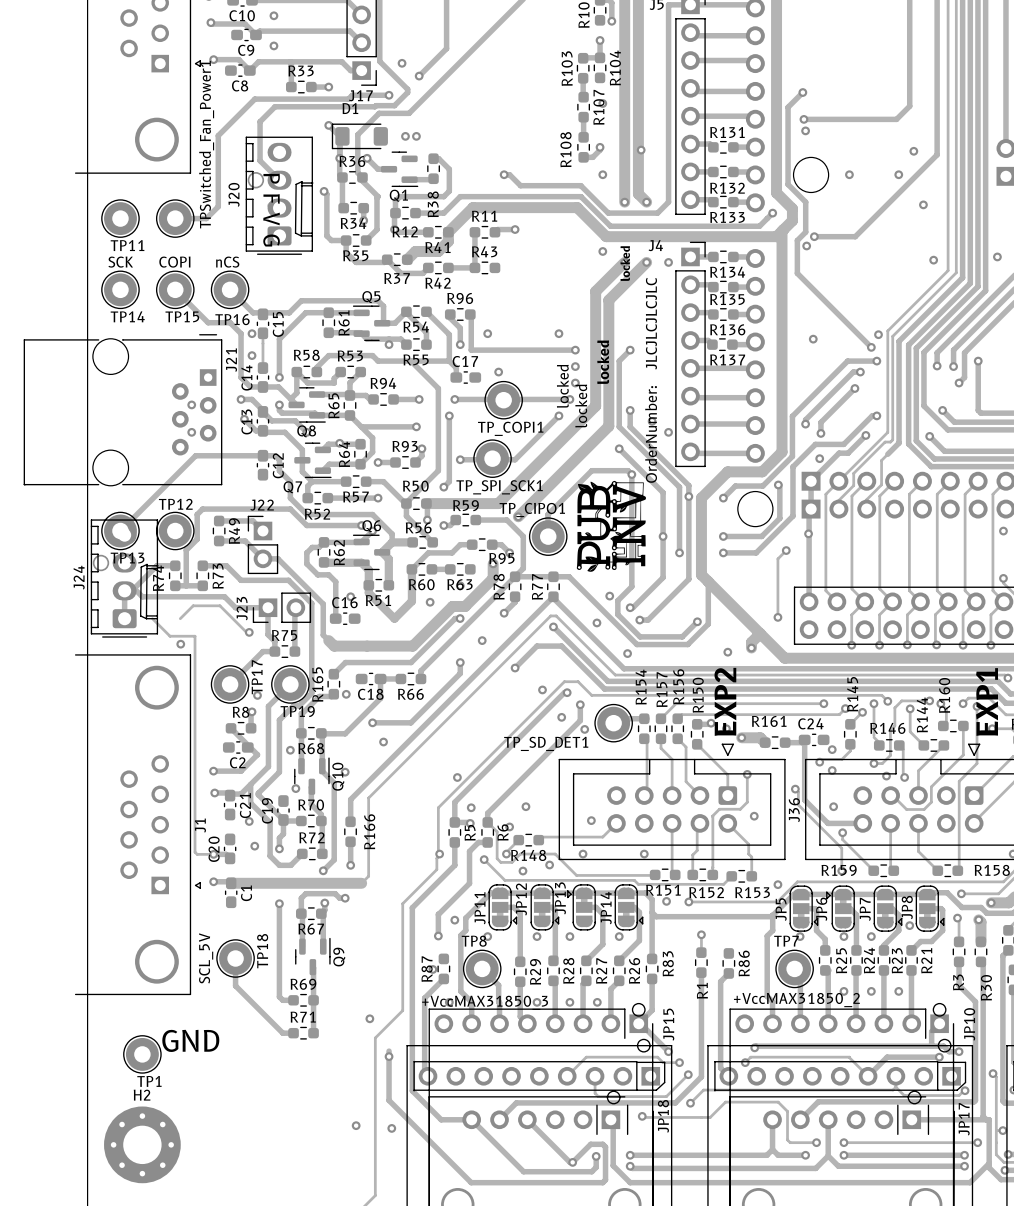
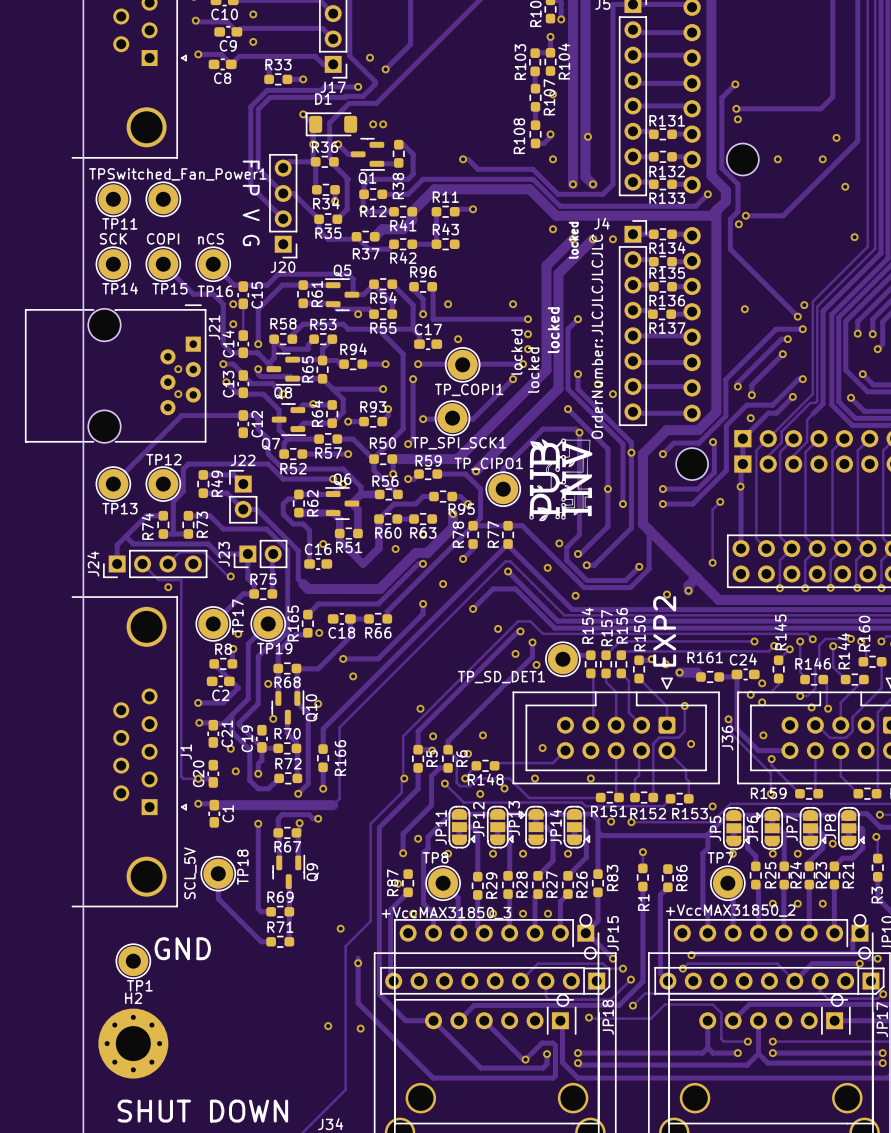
track: (289, 99) (254, 99) (218, 135) (218, 206) (206, 218) (175, 218) -> (267, 90) (250, 106) (250, 186) (283, 218)
track: (292, 106) (275, 106) (260, 121) (260, 160) (279, 180) -> (270, 97) (258, 109) (258, 168) (283, 193) (293, 193) (319, 219)
J20 footprint: [245, 136, 314, 255] -> [269, 154, 298, 259]
TPSwitched_Fan_Power1 name rotation: 0° (206, 144) -> 90° clockwise (177, 174)
track: none -> (315, 161) (289, 161) (283, 168)
track: (324, 191) (326, 194) (326, 235) (331, 240) (346, 240) -> none
via: (324, 191) -> none
J20 name position: J20 (234, 194) -> J20 (282, 267)
text: P F V G (271, 210) -> F P V G (251, 203)
J24 footprint: [90, 519, 159, 638] -> [103, 550, 208, 578]
J24 name position: J24 (79, 577) -> J24 (93, 563)

